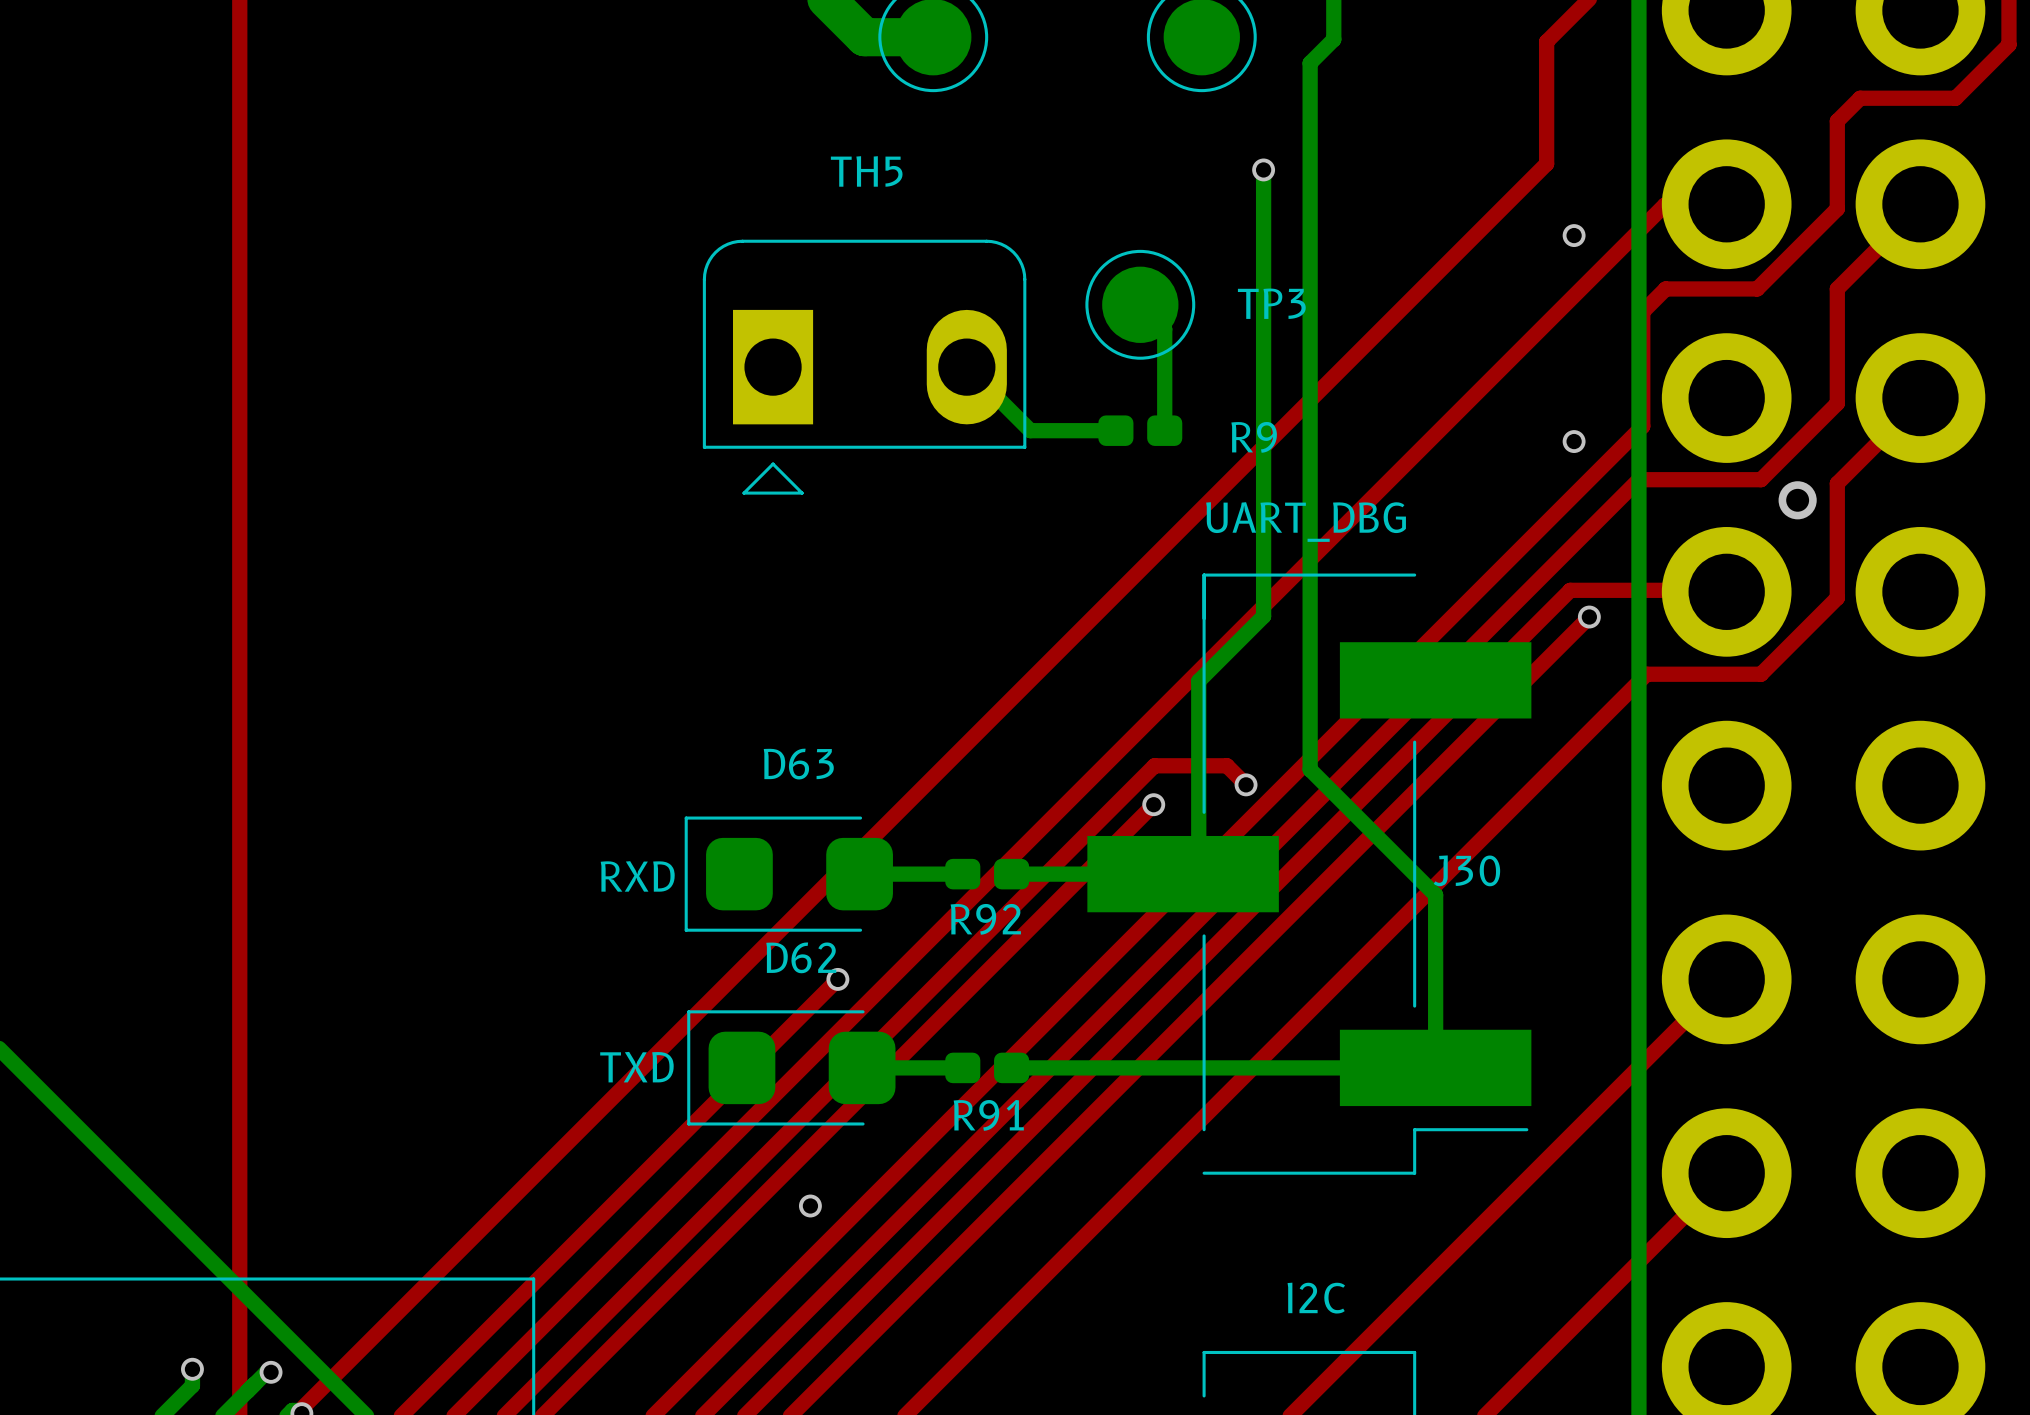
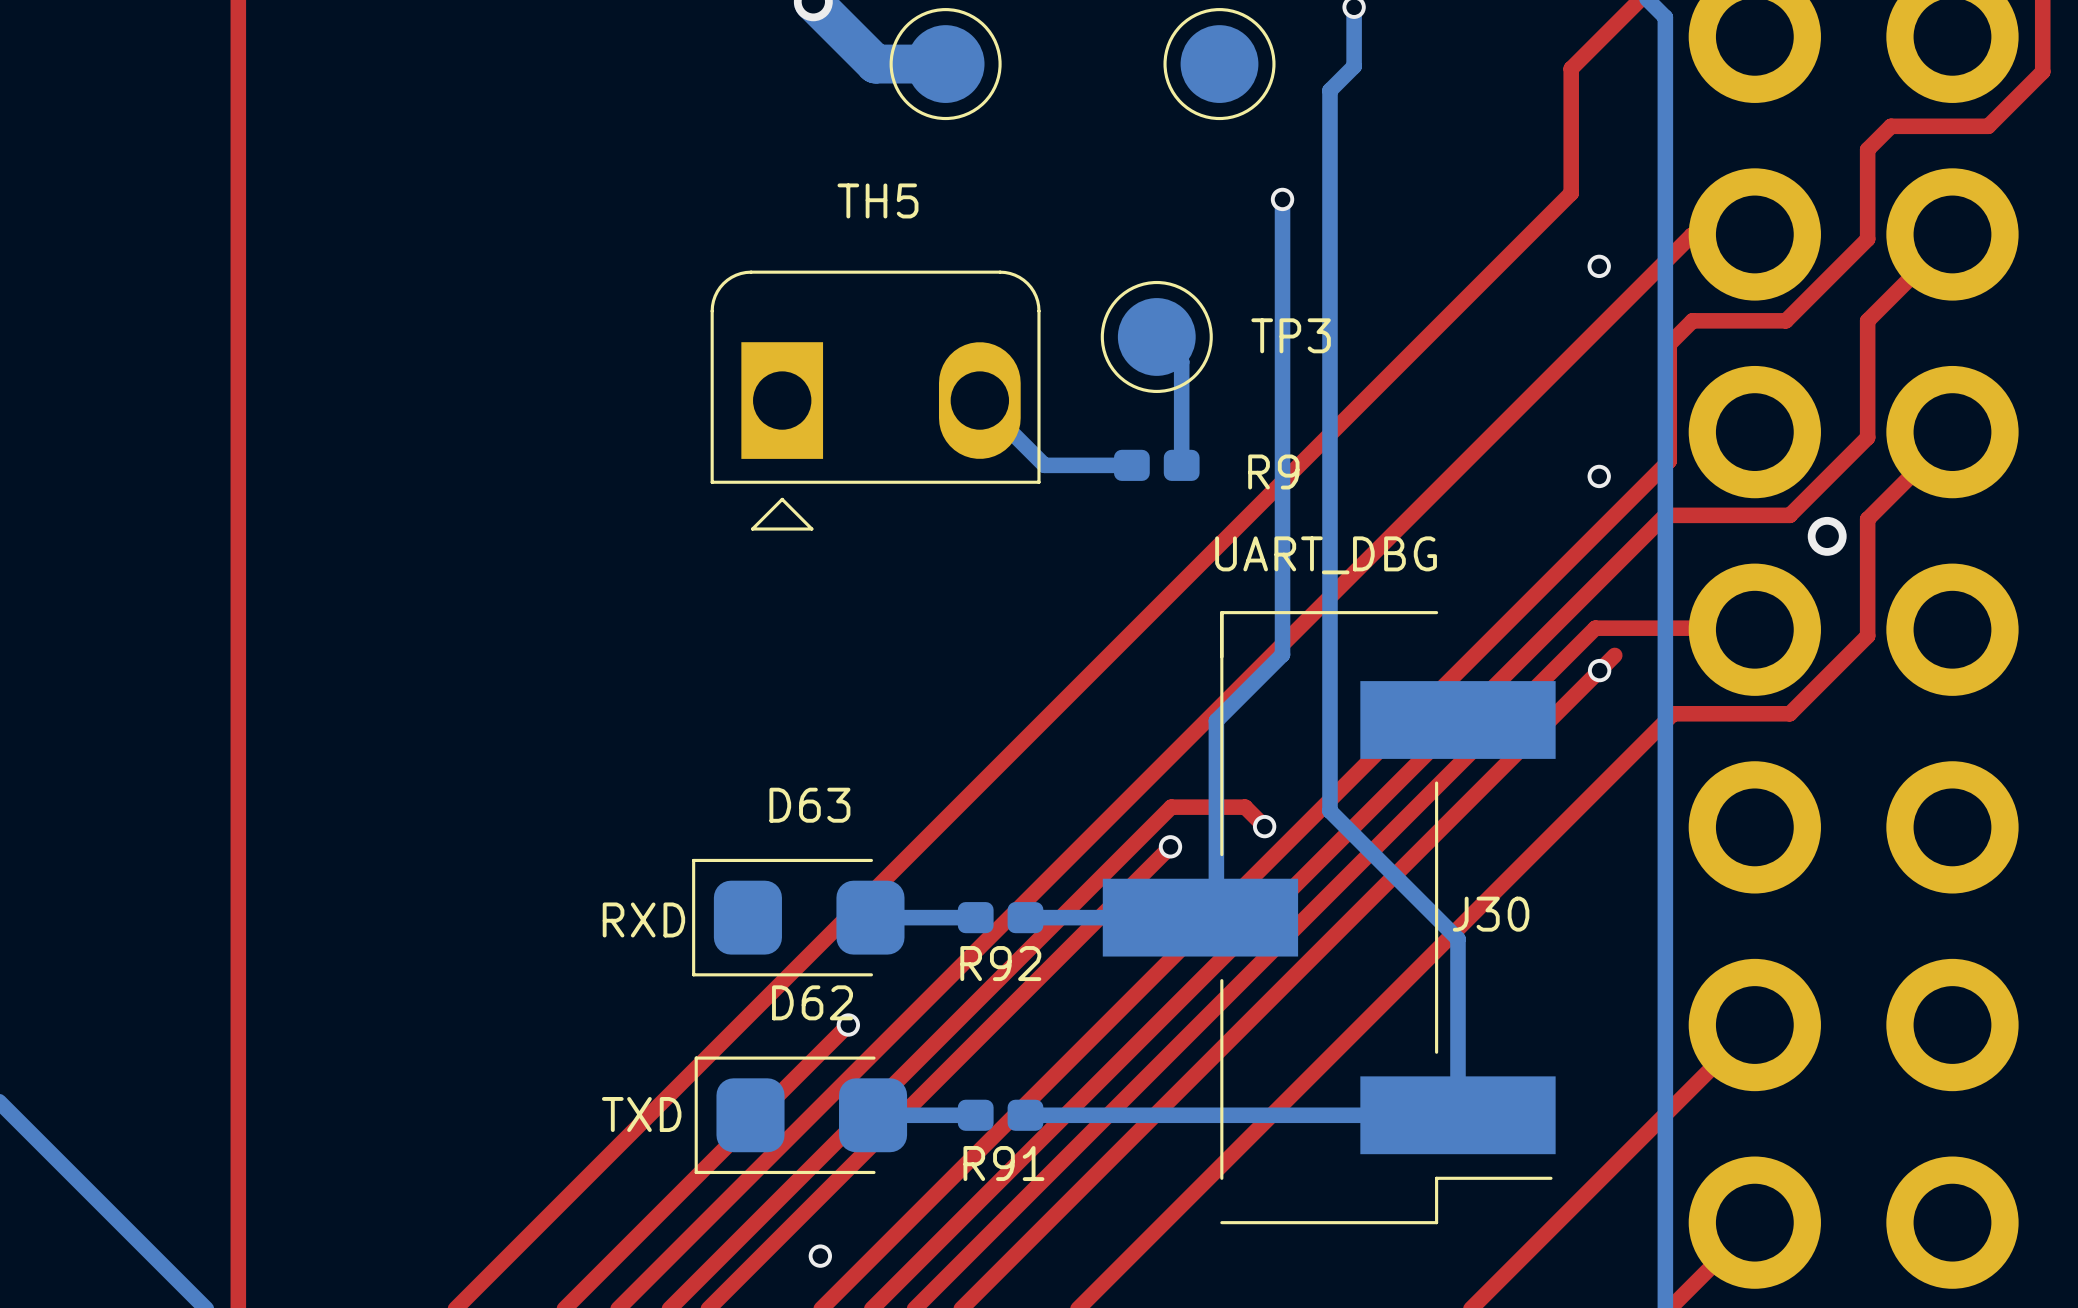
via position: (1589, 617) -> (1599, 670)

